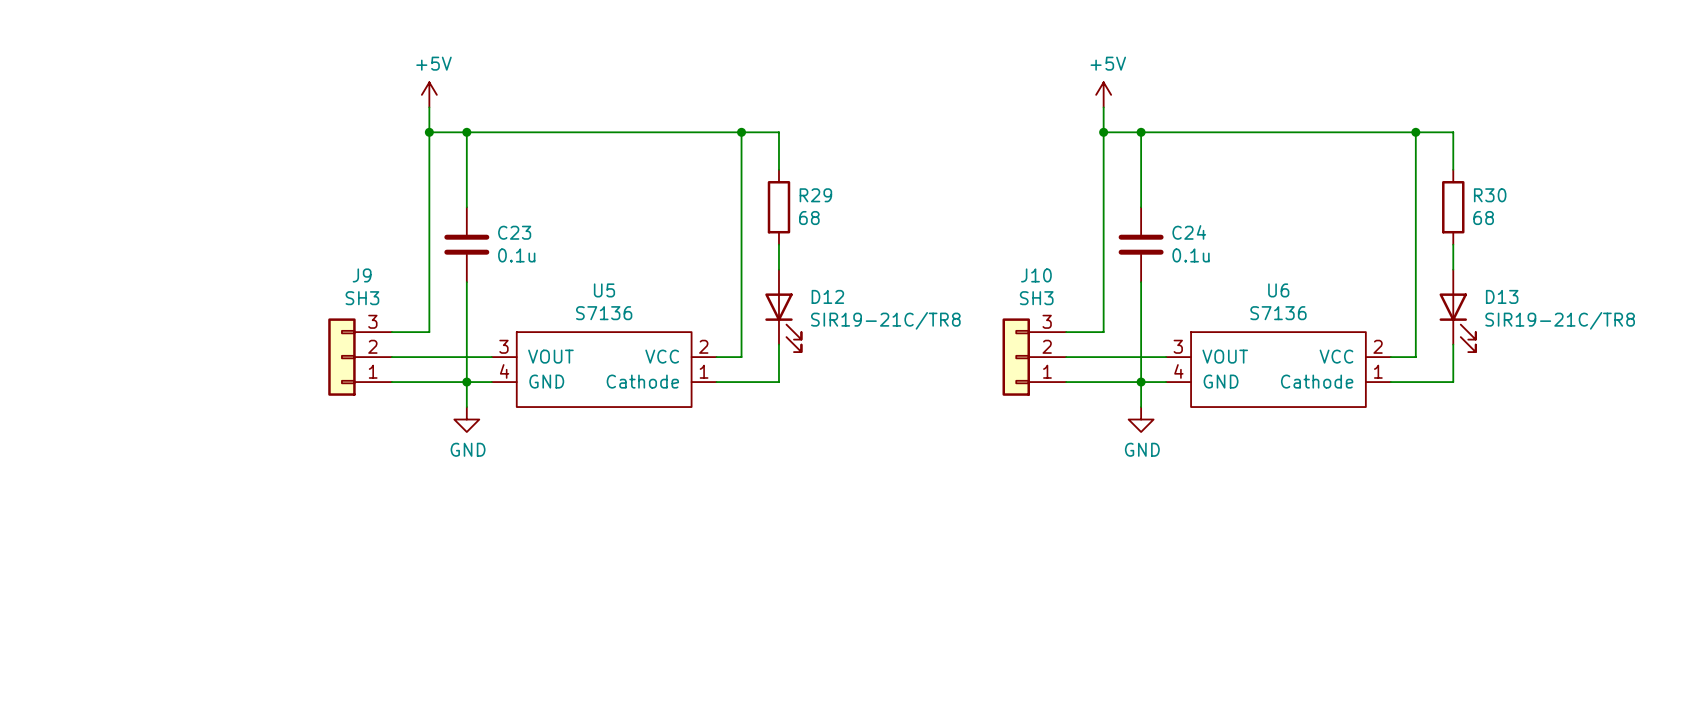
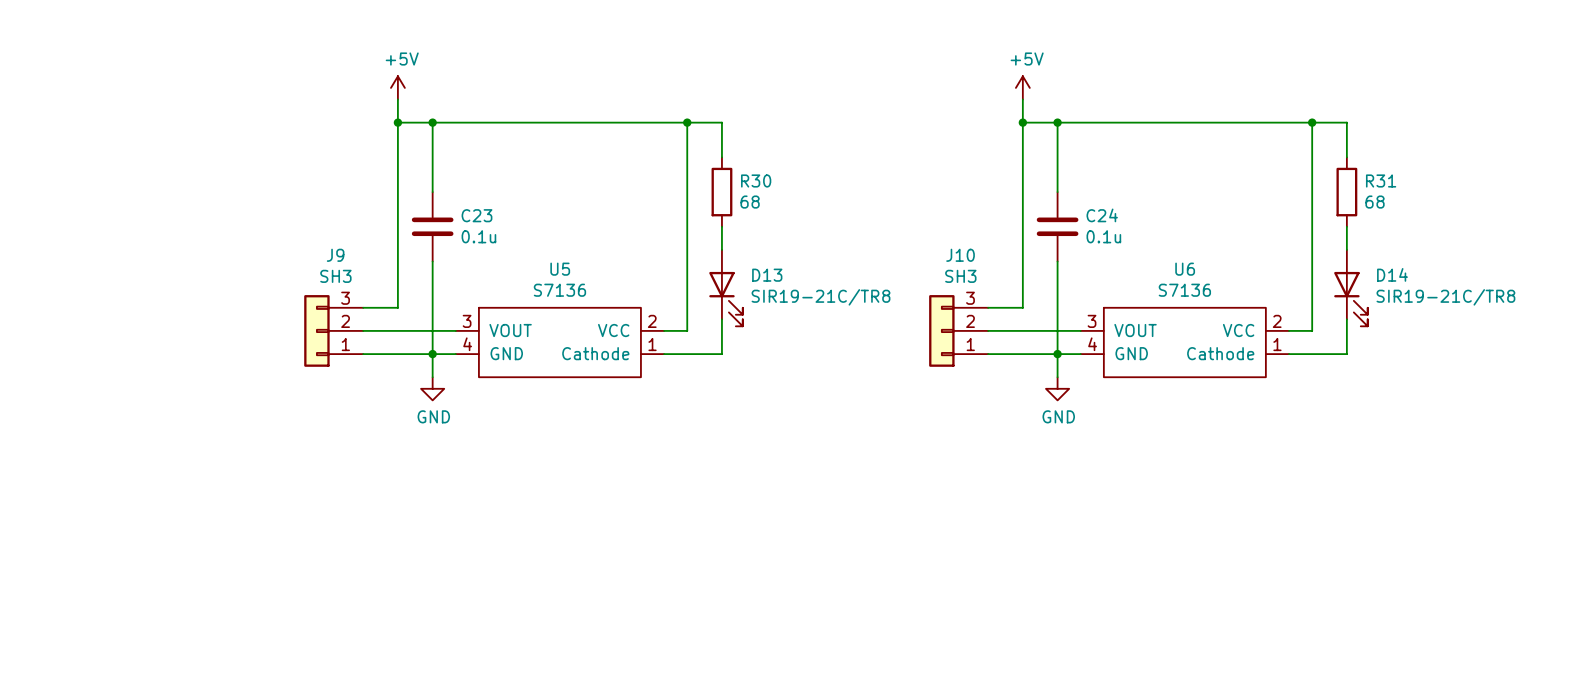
R29 name: R29 (815, 195) -> R30 (756, 180)
R30 name: R30 (1490, 195) -> R31 (1381, 180)
D12 name: D12 (827, 296) -> D13 (767, 275)
D13 name: D13 (1502, 296) -> D14 (1392, 274)

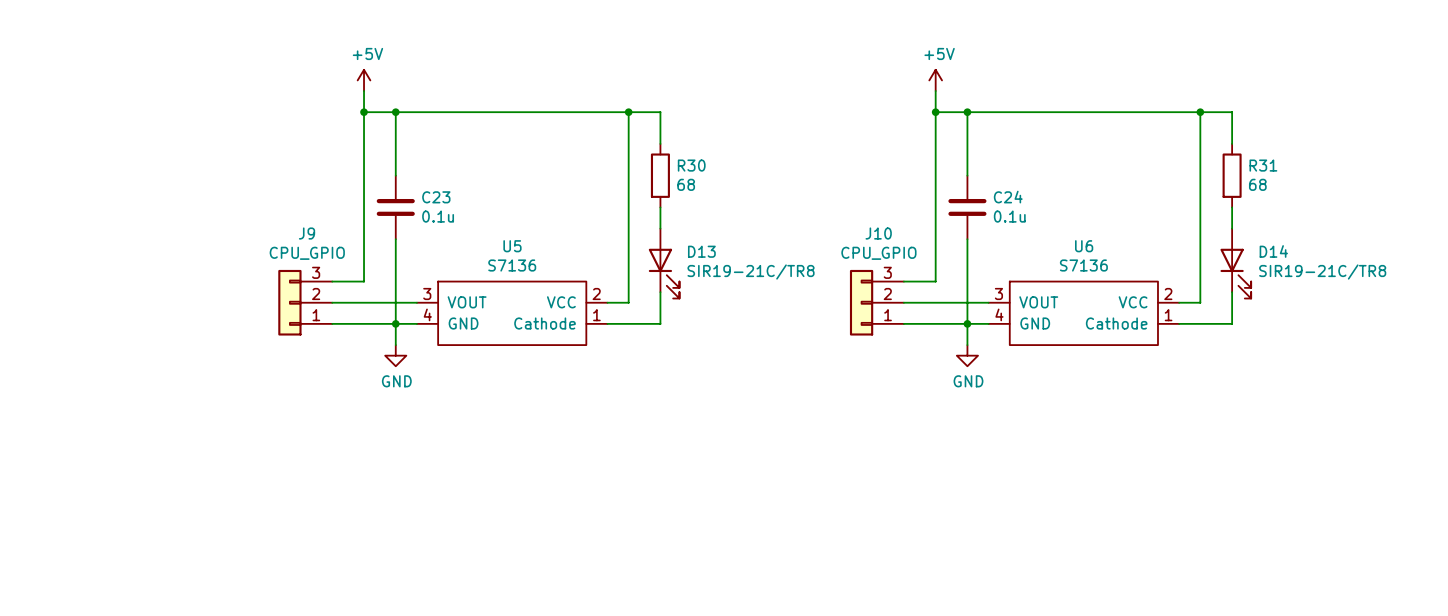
J9 value: SH3 (335, 276) -> CPU_GPIO (307, 253)
J10 value: SH3 (960, 276) -> CPU_GPIO (878, 253)

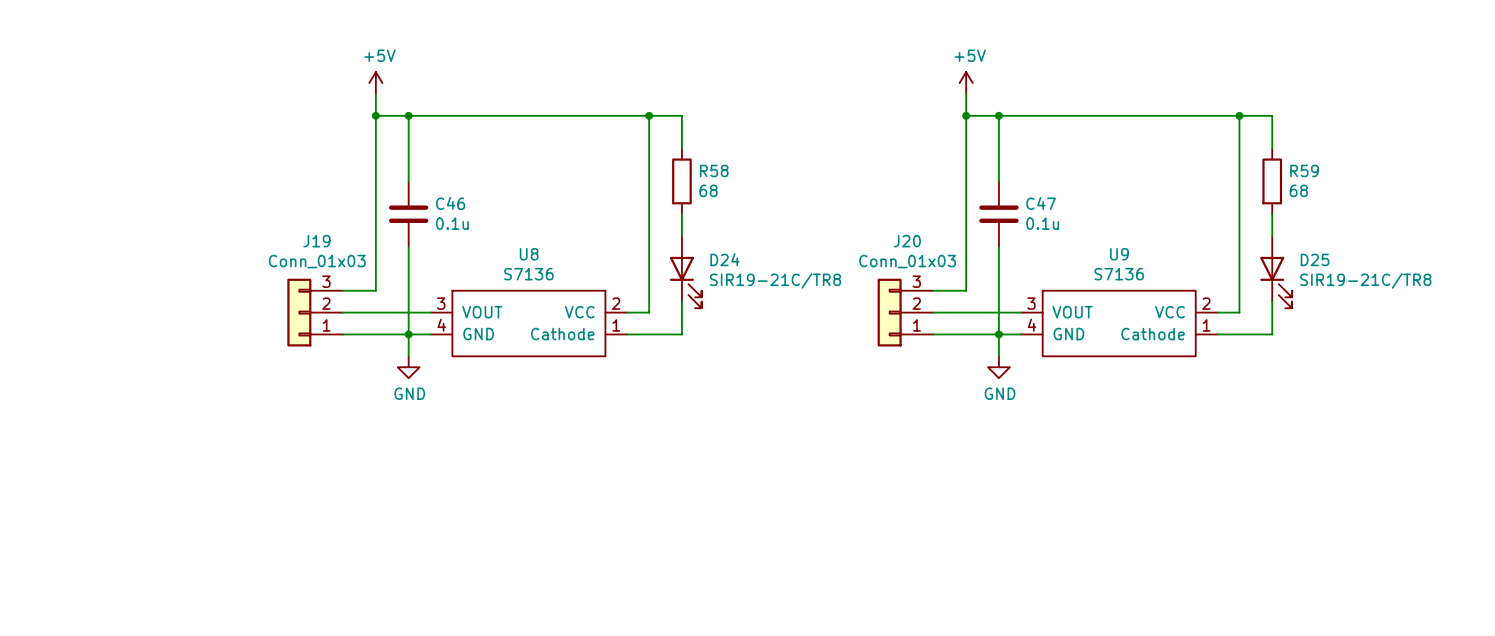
R30 name: R30 (691, 165) -> R58 (714, 170)
R31 name: R31 (1263, 165) -> R59 (1304, 170)
C23 name: C23 (436, 197) -> C46 (450, 203)
C24 name: C24 (1008, 197) -> C47 (1041, 203)
J9 name: J9 (307, 233) -> J19 (317, 241)
J10 name: J10 (878, 233) -> J20 (907, 241)
U5 name: U5 (512, 246) -> U8 (529, 254)
U6 name: U6 (1084, 246) -> U9 (1119, 254)
D13 name: D13 (701, 251) -> D24 (725, 259)
D14 name: D14 (1273, 251) -> D25 (1315, 259)
J9 value: CPU_GPIO (307, 253) -> Conn_01x03 (317, 261)
J10 value: CPU_GPIO (878, 253) -> Conn_01x03 (907, 261)

